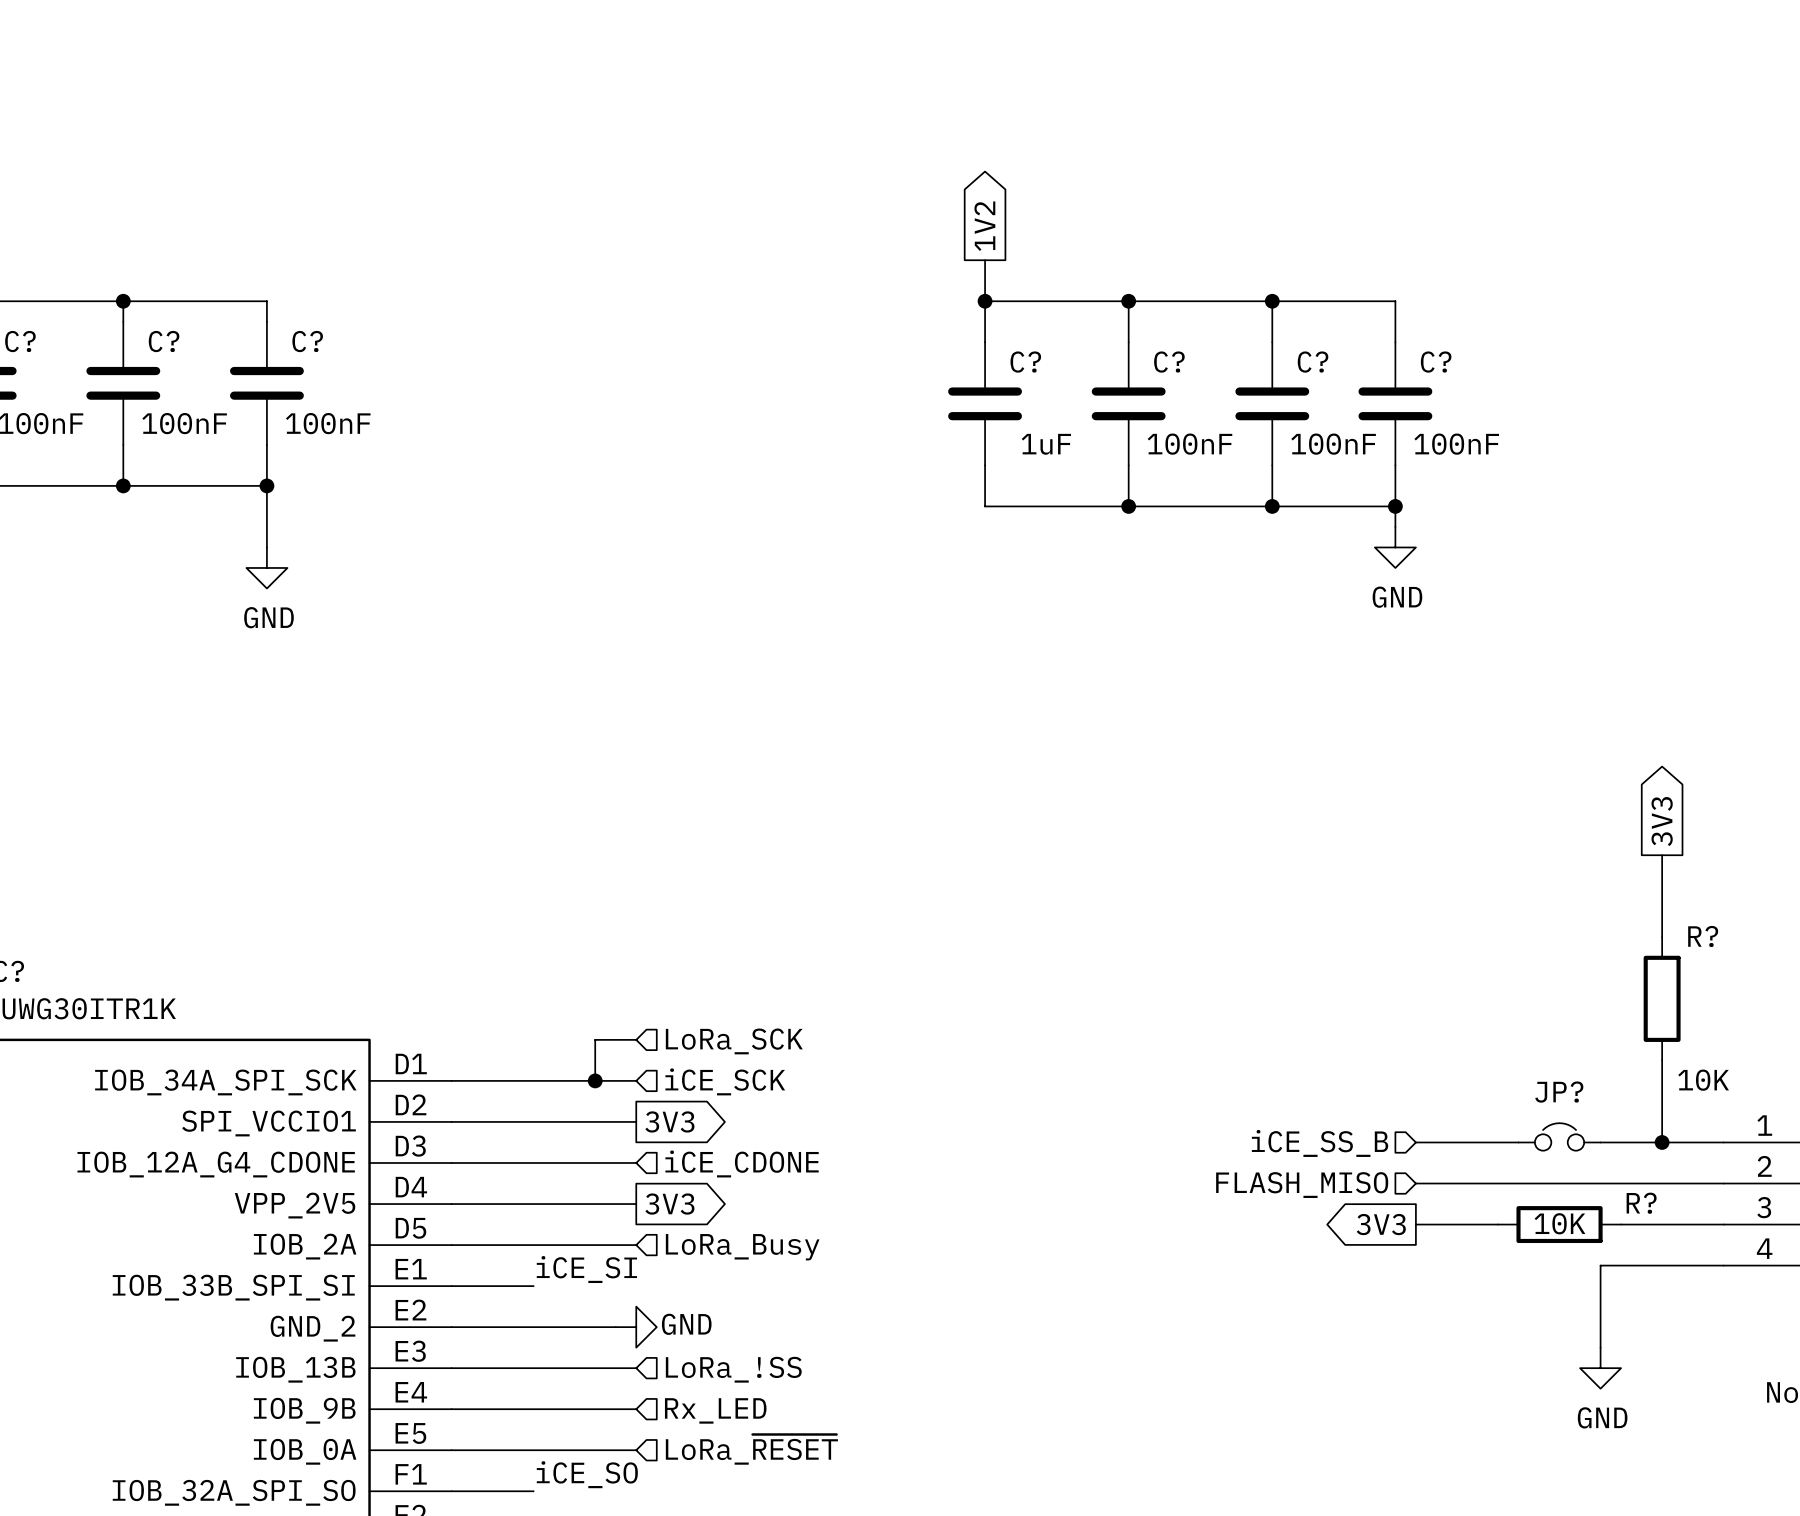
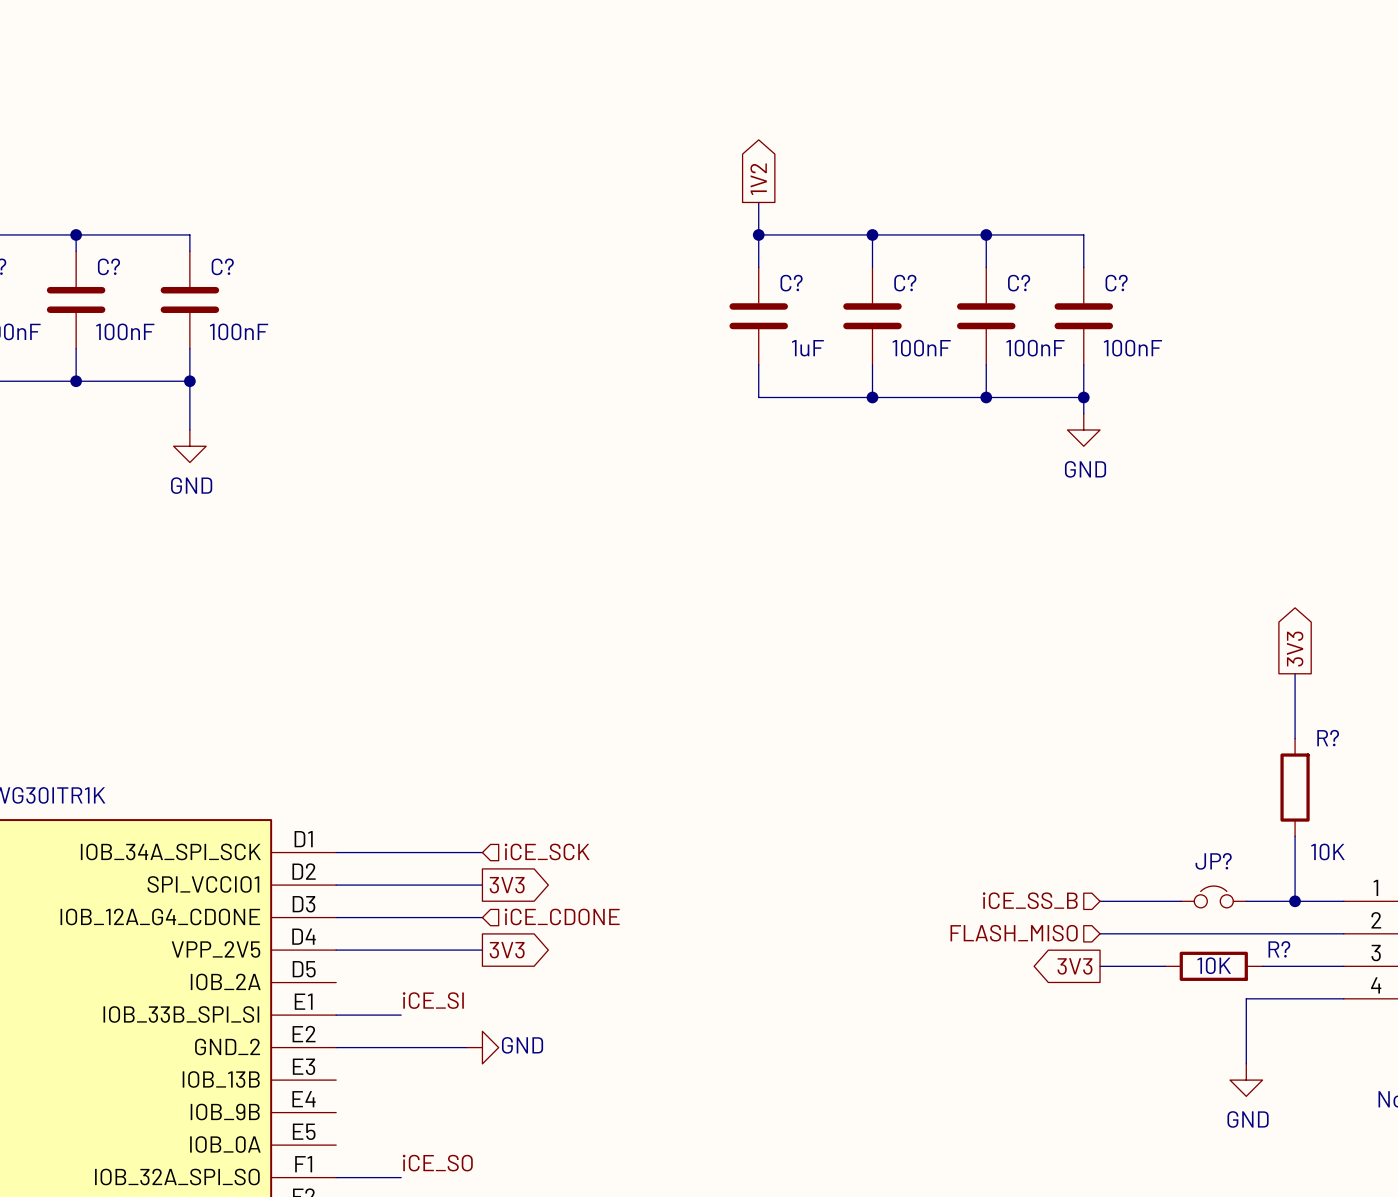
wire: (636, 1039) (595, 1039) (595, 1080) -> none
hierarchical label: LoRa_SCK (734, 1041) -> none
junction: (595, 1080) -> none
wire: (451, 1245) (636, 1245) -> none
hierarchical label: LoRa_Busy (742, 1247) -> none
wire: (451, 1368) (636, 1368) -> none
hierarchical label: LoRa_!SS (733, 1369) -> none
wire: (451, 1409) (636, 1409) -> none
hierarchical label: Rx_LED (715, 1410) -> none
hierarchical label: LoRa_~{RESET} (751, 1449) -> none
wire: (451, 1450) (636, 1450) -> none

